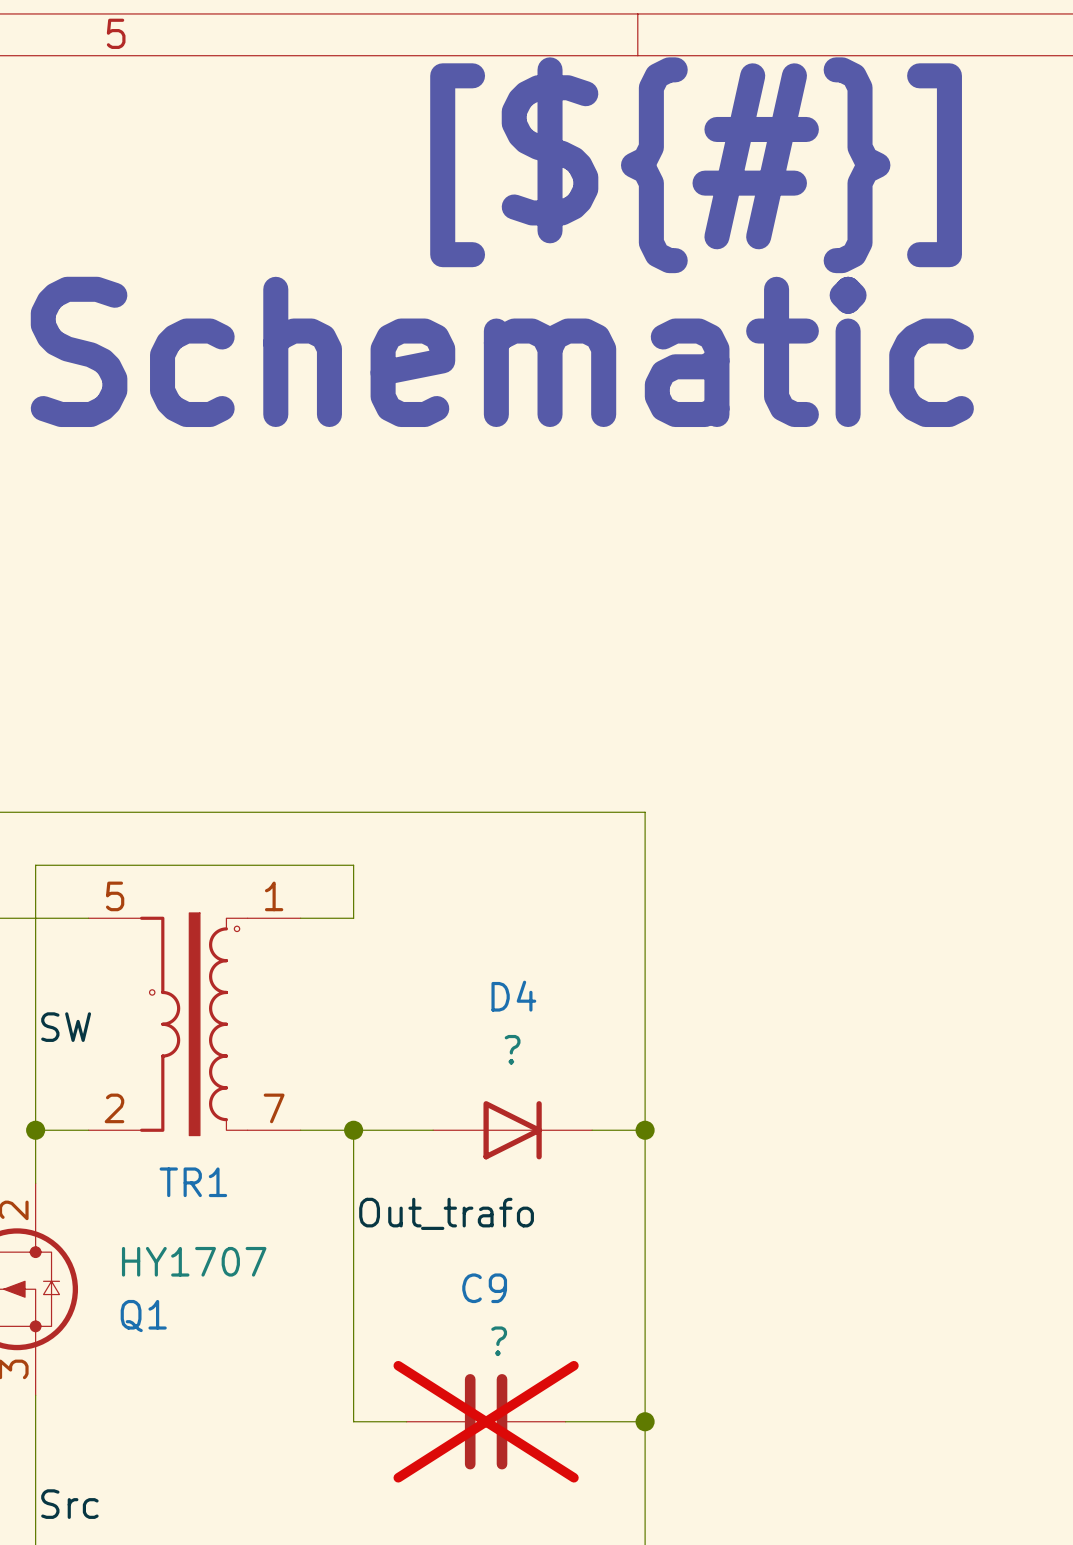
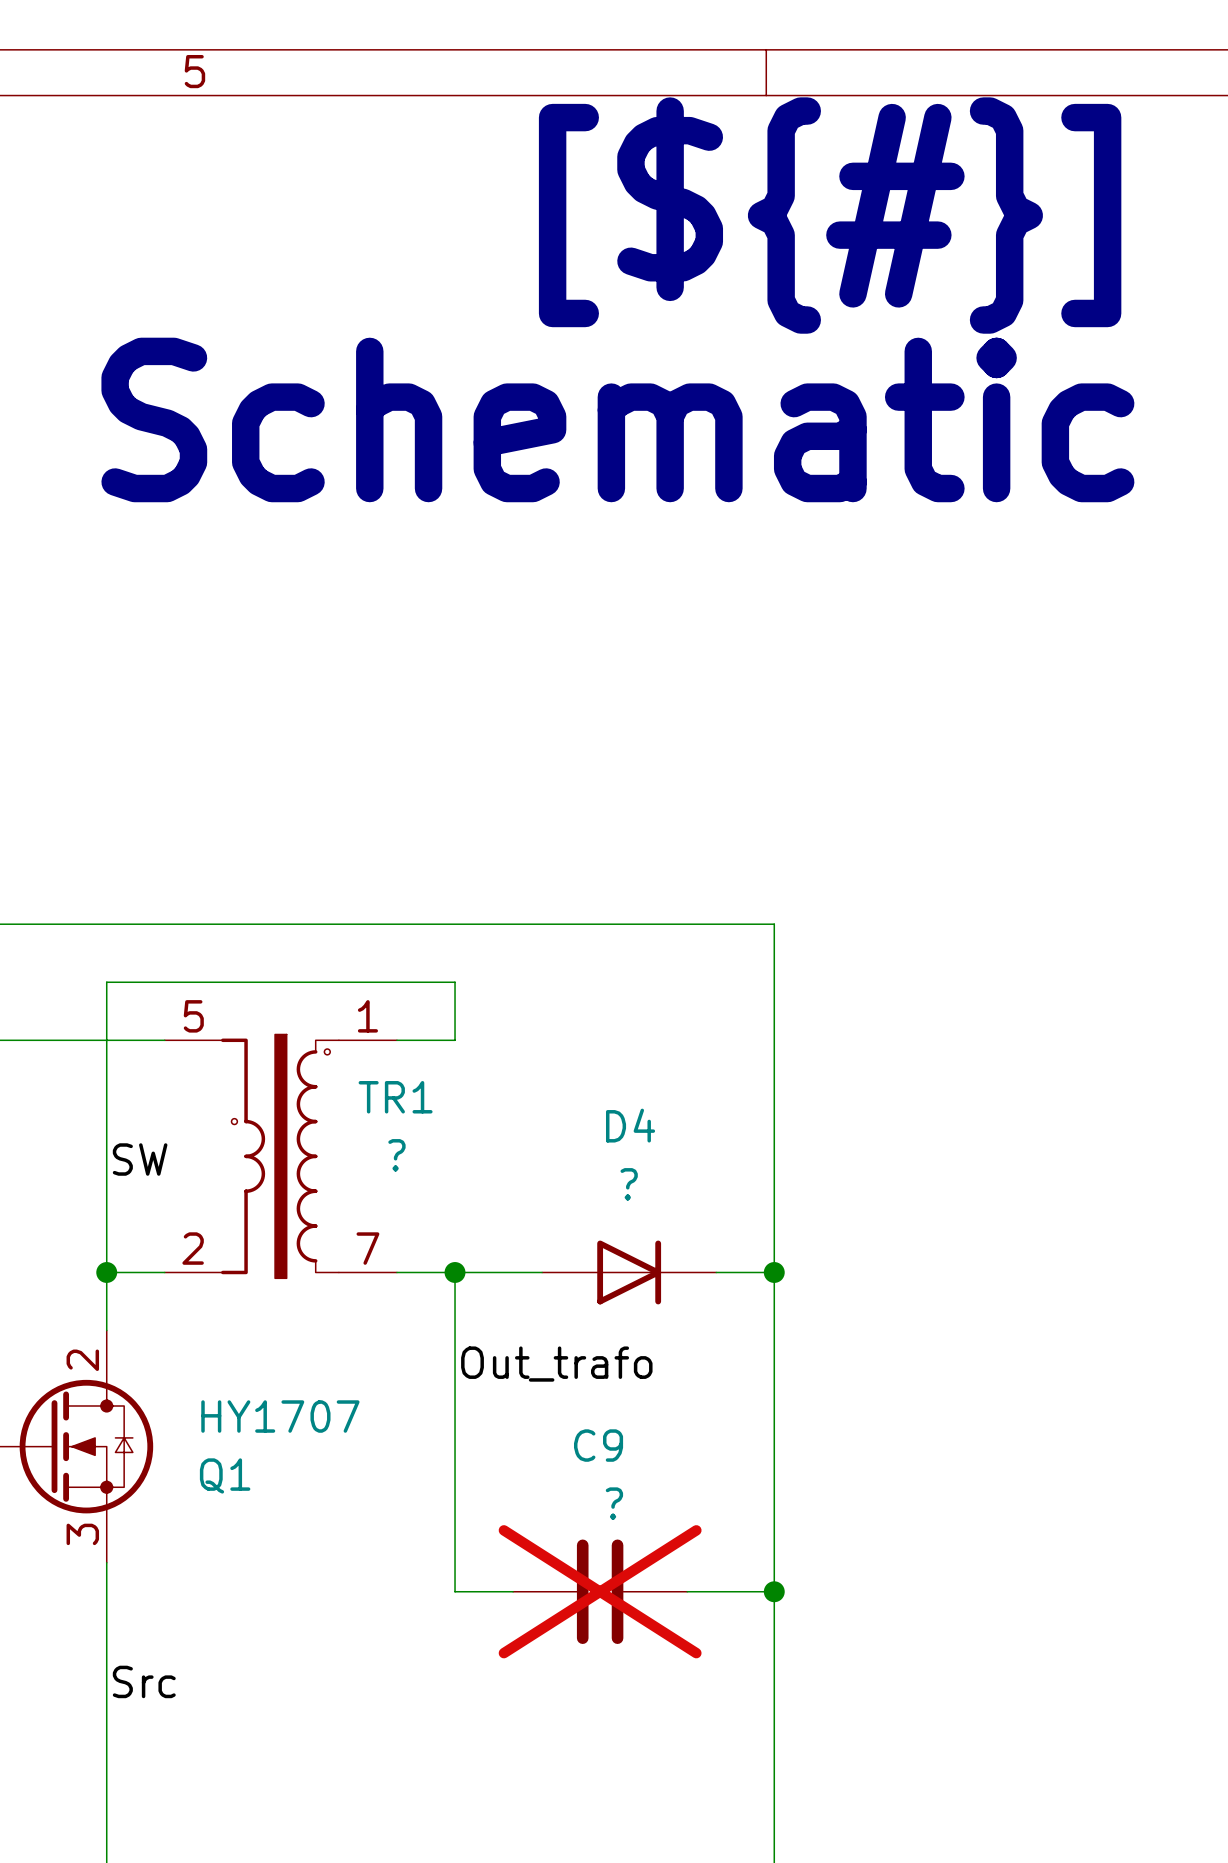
TR1 value: none -> ? (396, 1155)
TR1 name position: TR1 (193, 1182) -> TR1 (395, 1097)

